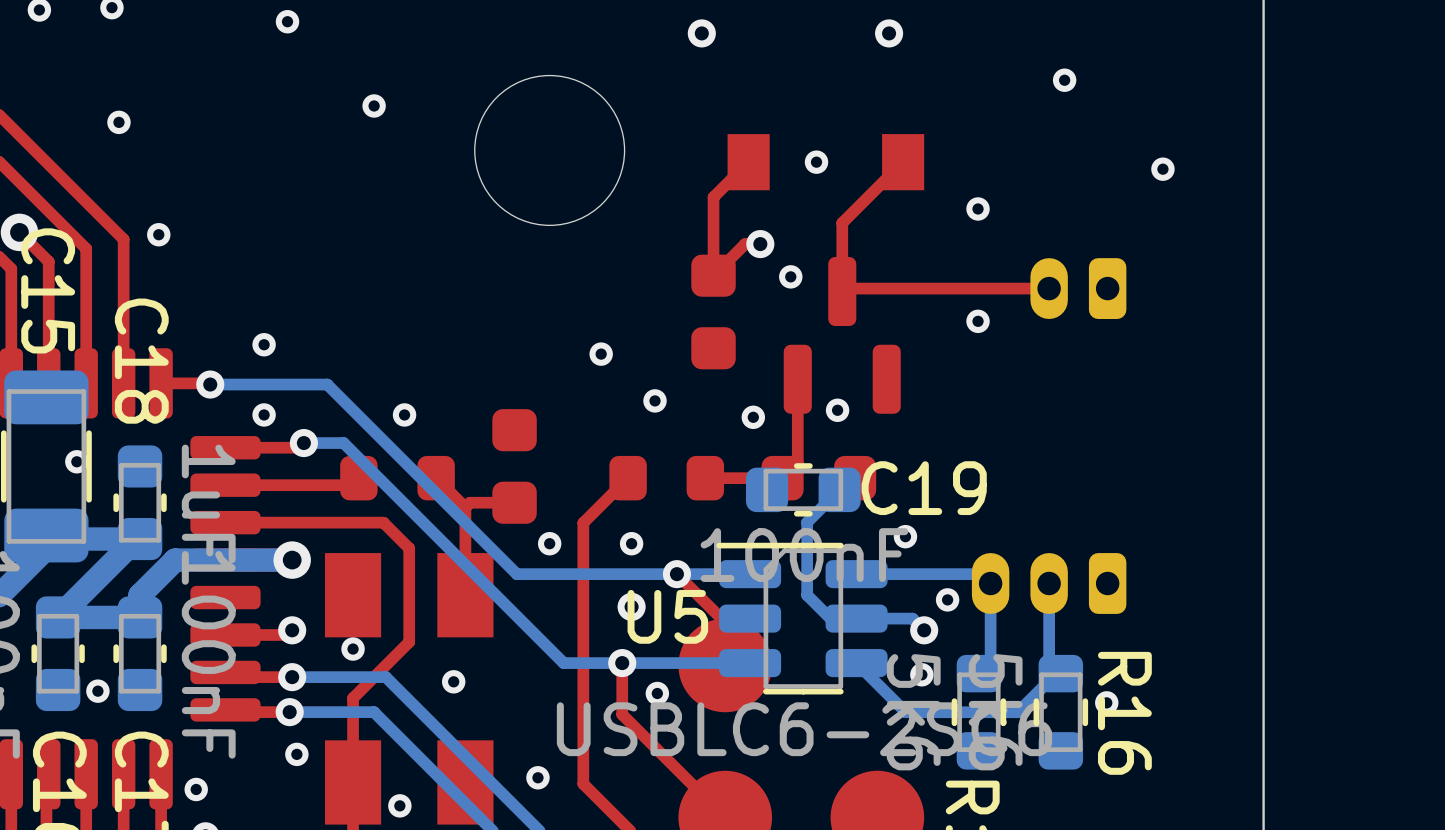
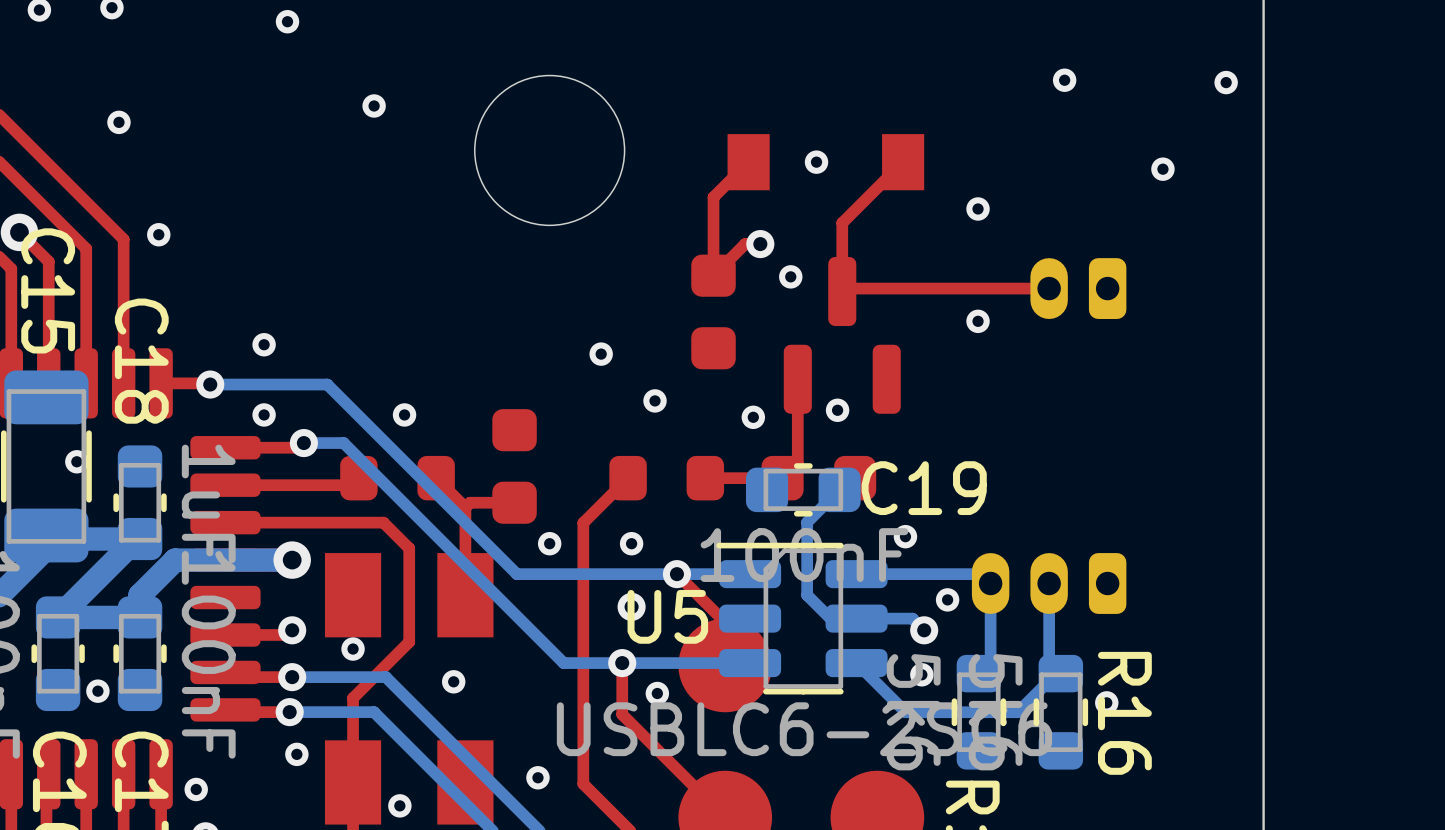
via: (701, 33) -> none
via: (889, 33) -> none
via: none -> (1226, 82)

